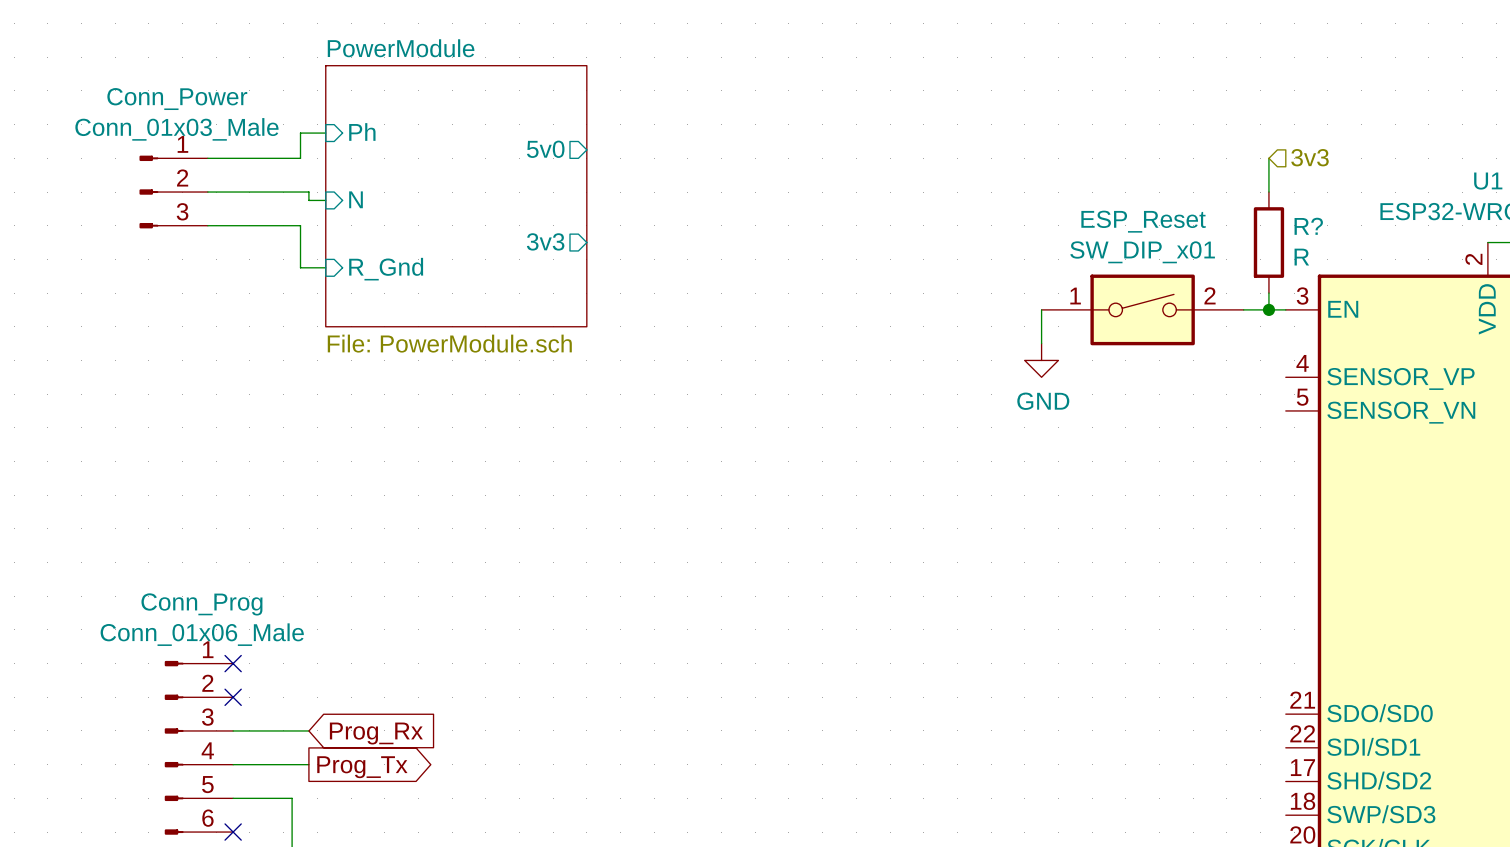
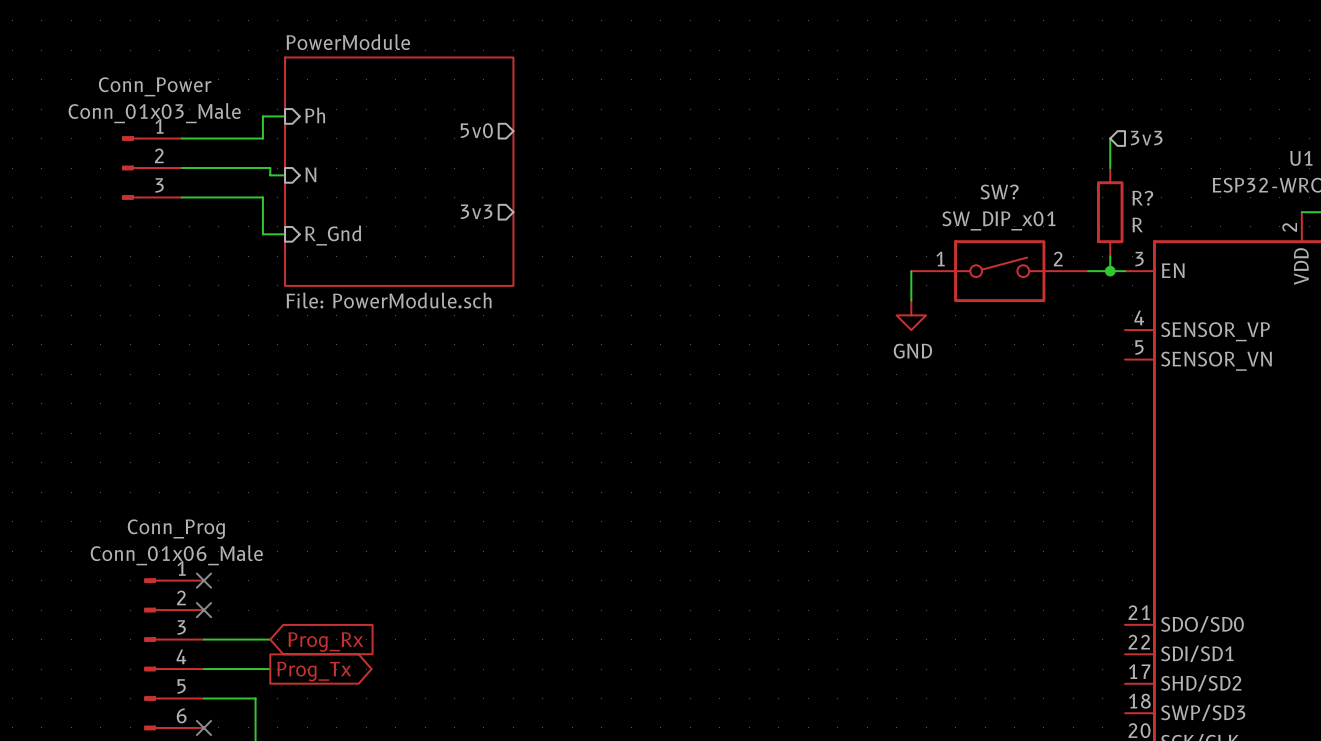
ESP_Reset name: ESP_Reset (1143, 221) -> SW? (999, 191)

